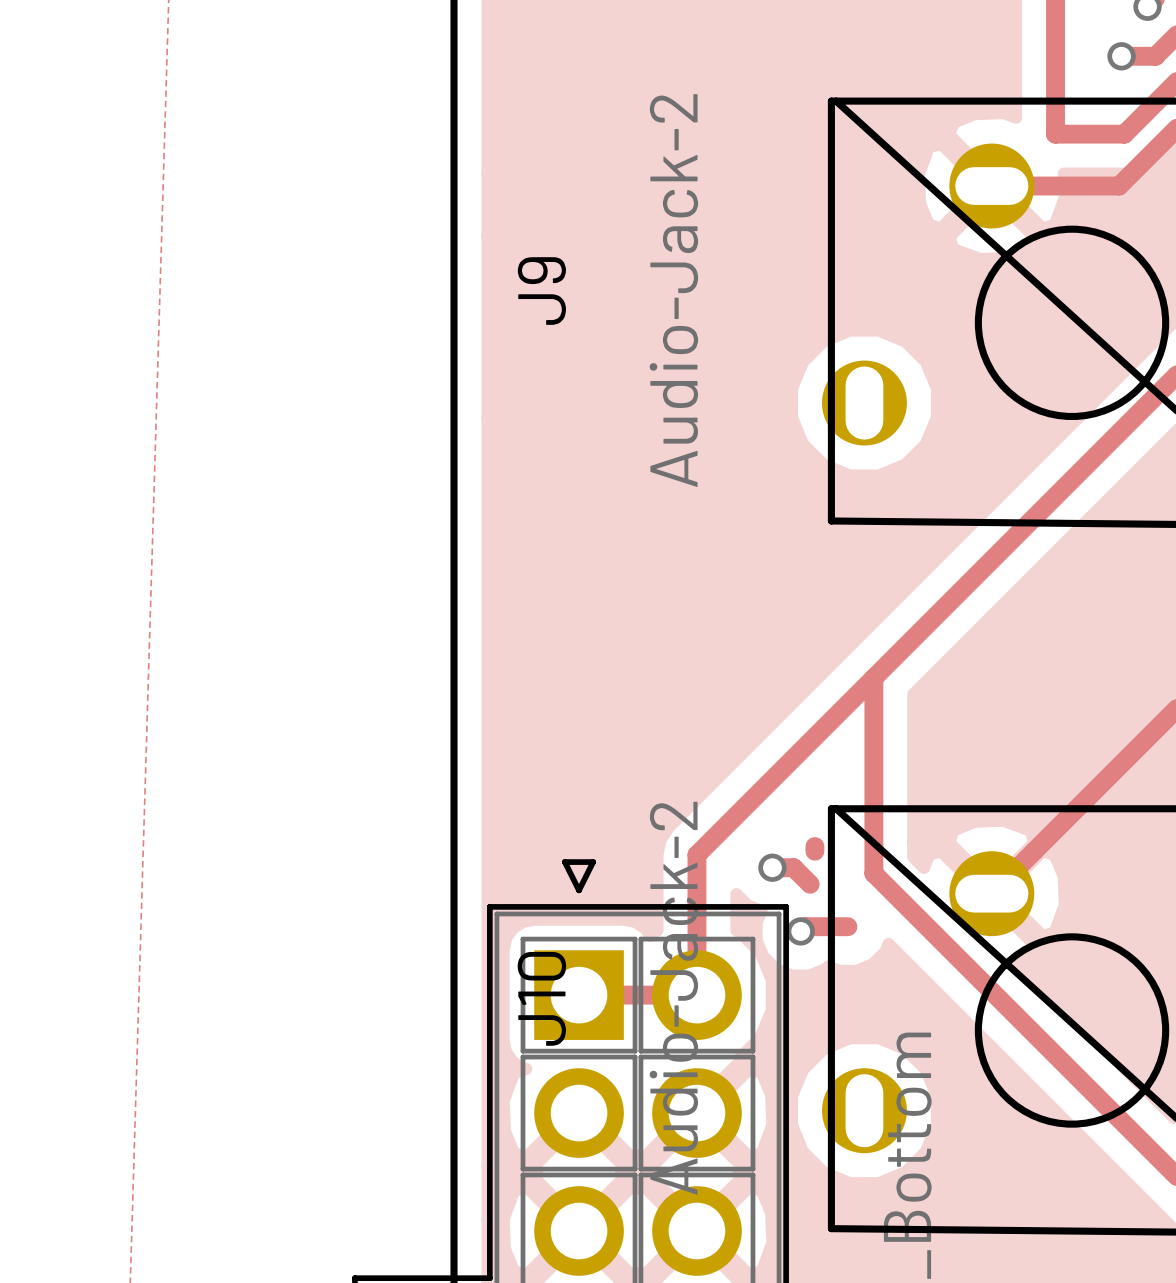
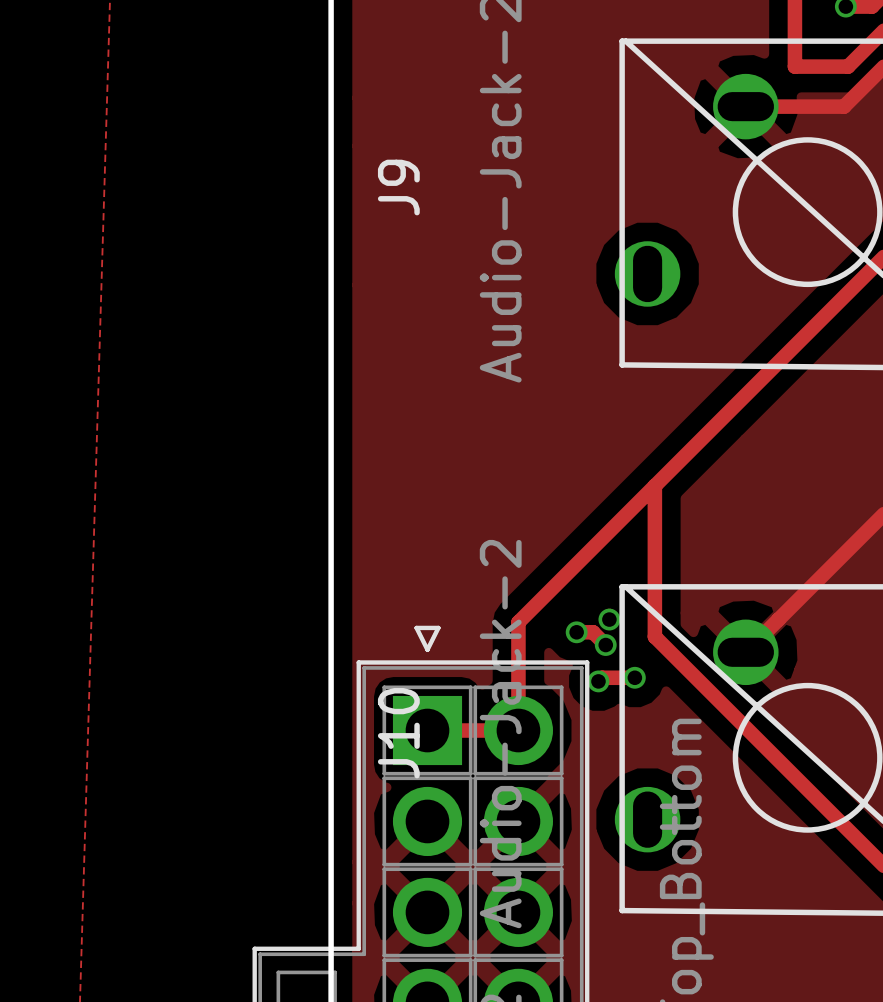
via: none -> (609, 619)
via: none -> (605, 645)
via: none -> (634, 677)

